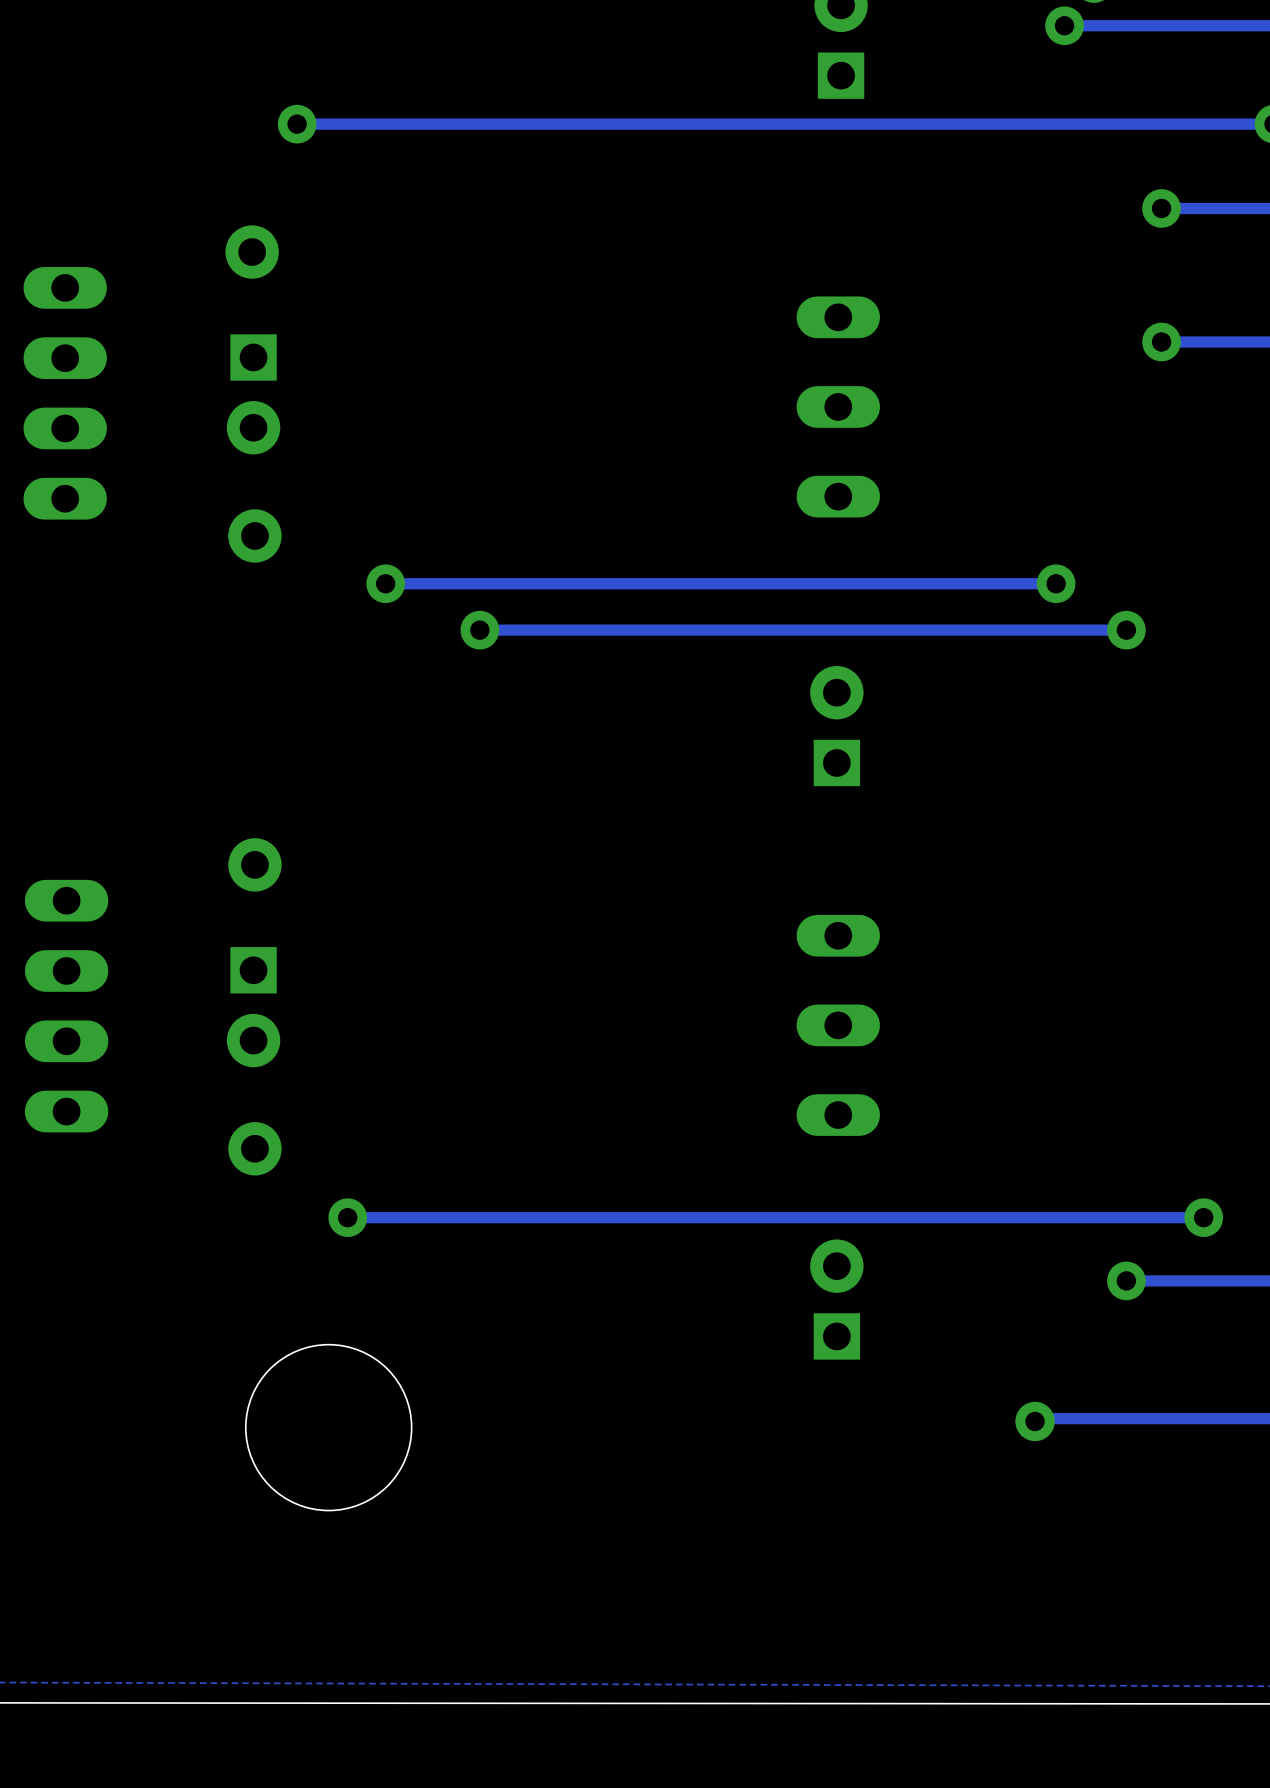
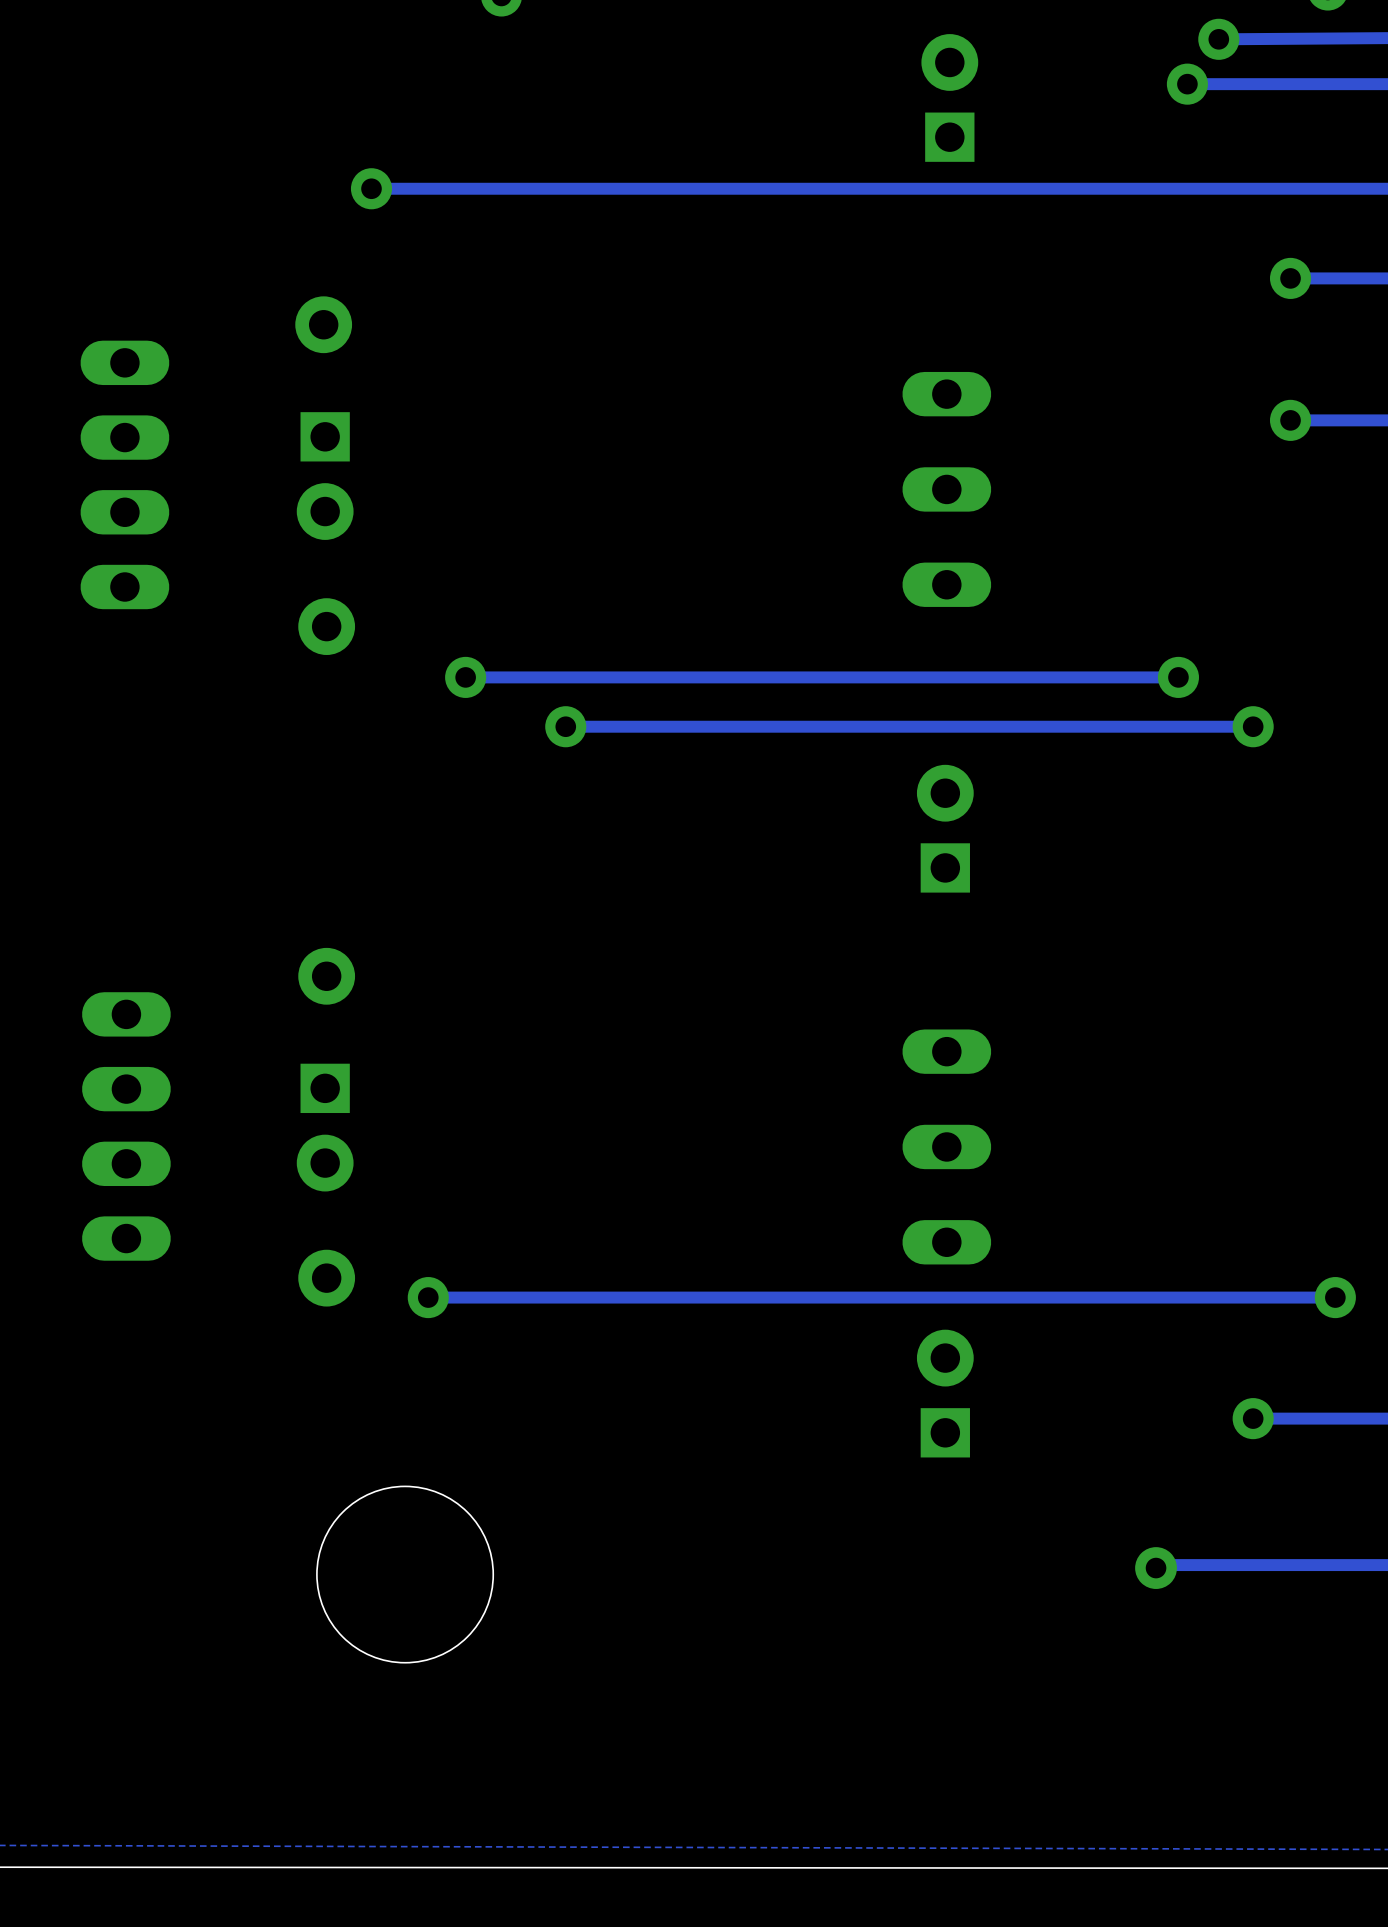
track: none -> (1335, 1297) (428, 1297)
via position: (347, 1217) -> (428, 1297)
track: (1203, 1217) (347, 1217) -> none
via position: (1203, 1217) -> (1335, 1297)
part position: (836, 1299) -> (945, 1393)

